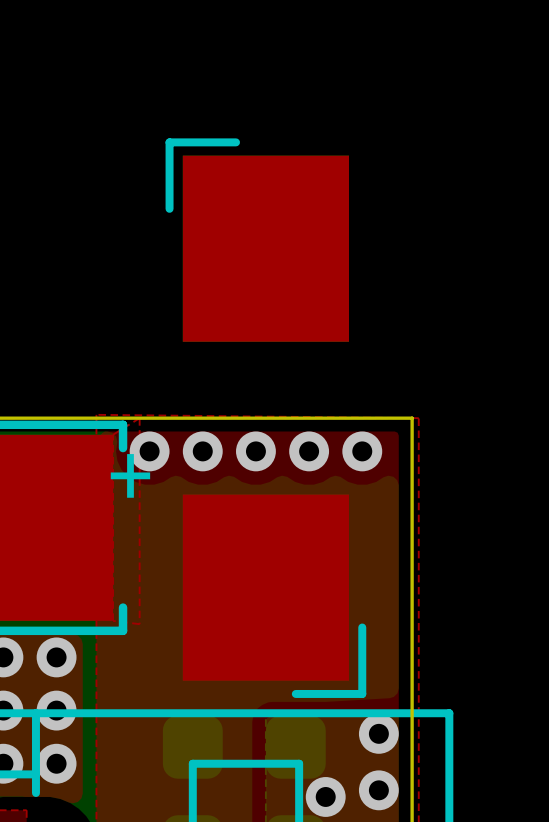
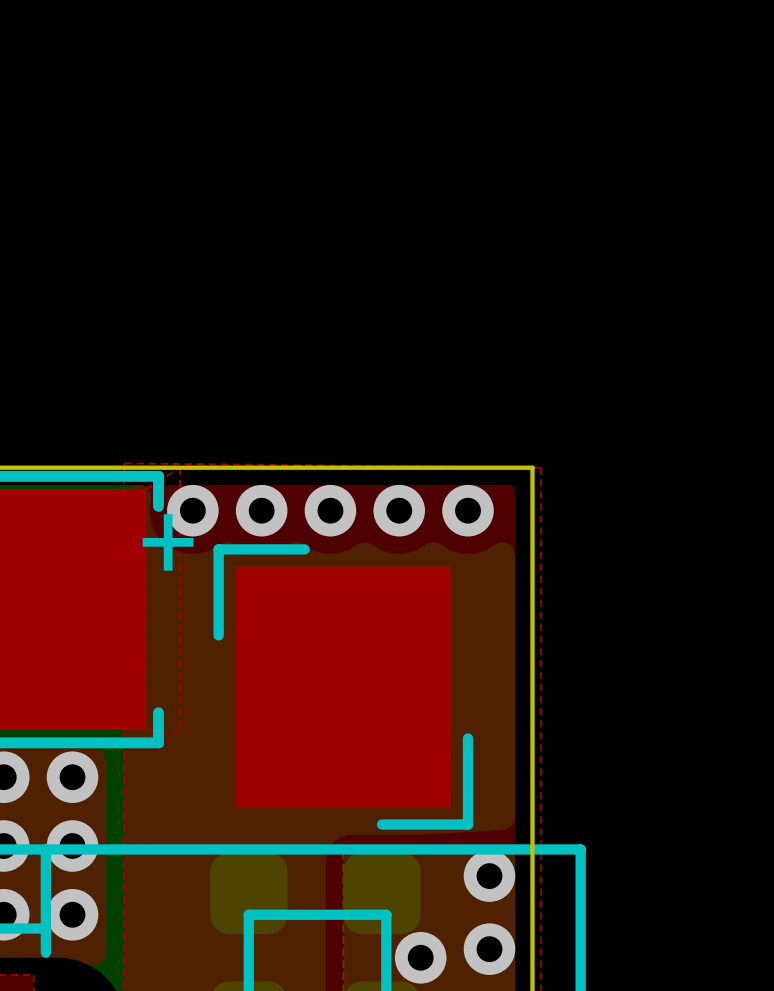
part: (265, 418) -> none
part: none -> (343, 686)

